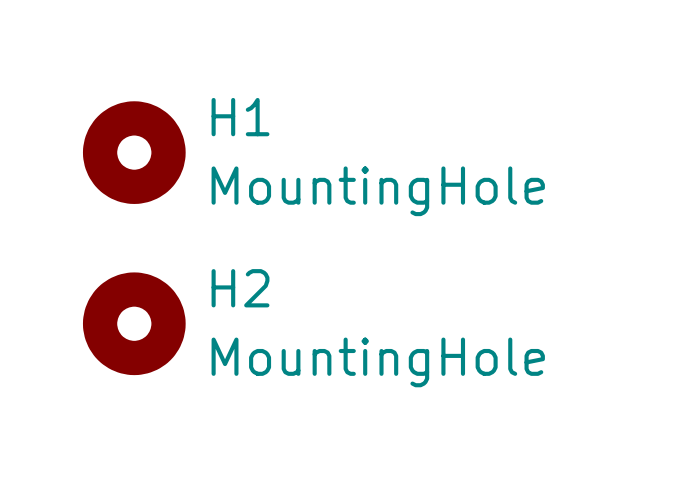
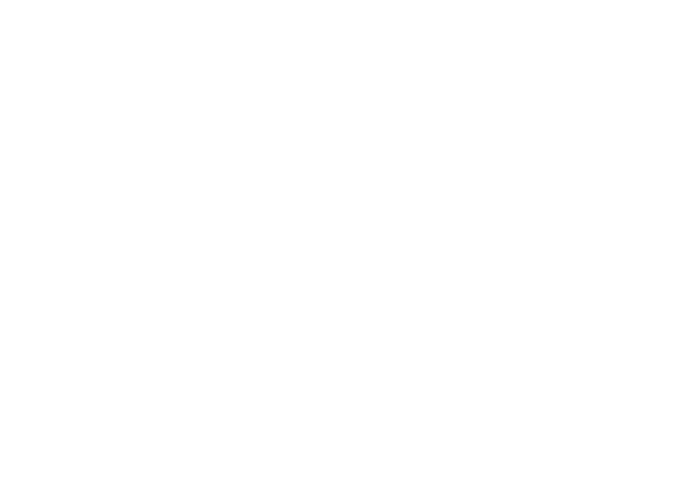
H1: MountingHole (134, 152) -> none
H2: MountingHole (134, 323) -> none

